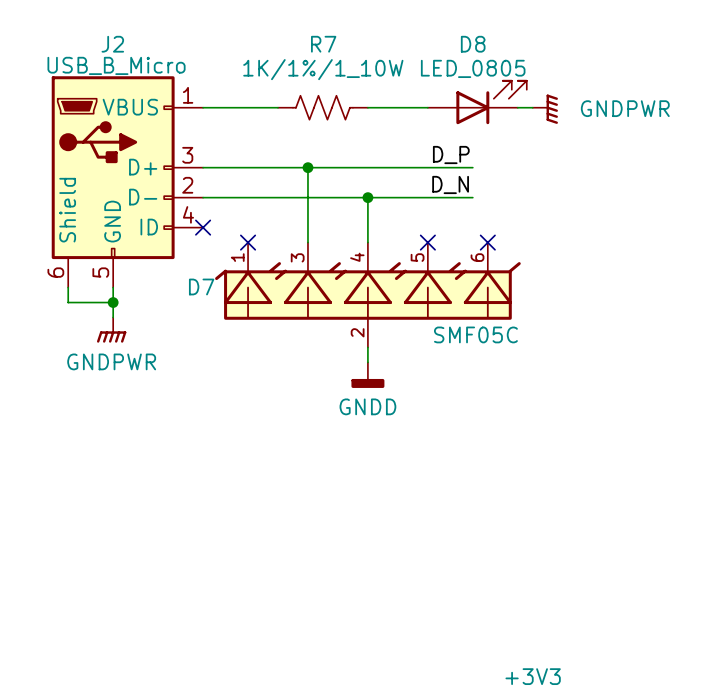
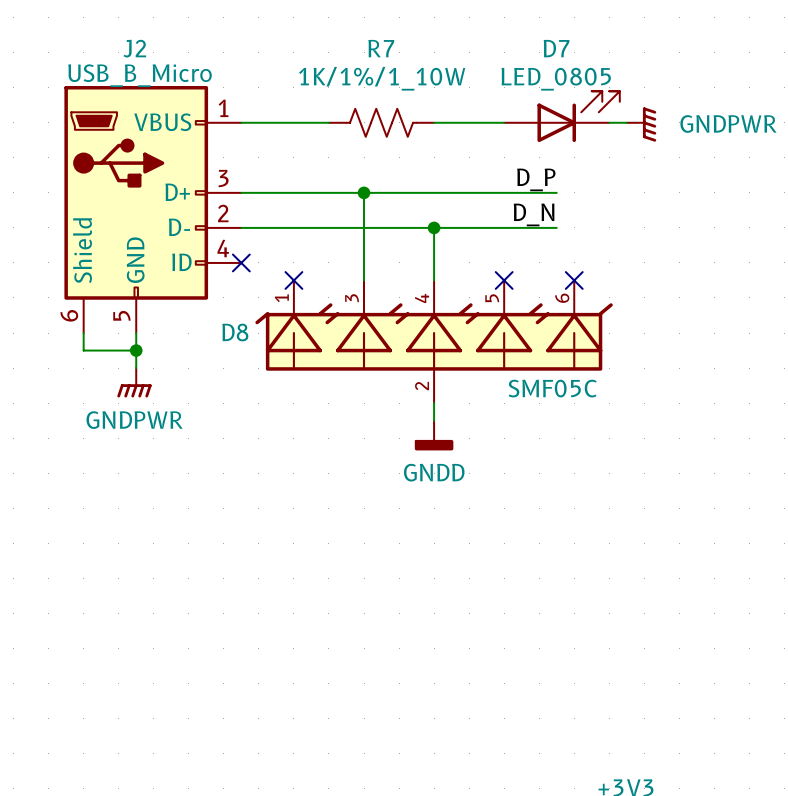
D8 name: D8 (473, 44) -> D7 (556, 48)
D7 name: D7 (201, 286) -> D8 (235, 332)

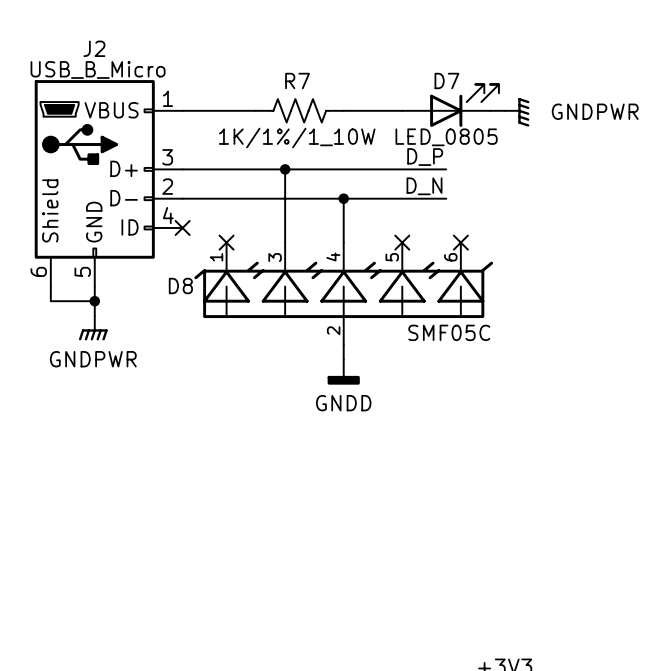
R7 name position: R7 (381, 48) -> R7 (297, 80)
D7 name position: D7 (556, 48) -> D7 (446, 80)
R7 value position: 1K/1%/1_10W (382, 78) -> 1K/1%/1_10W (297, 138)
D7 value position: LED_0805 (556, 79) -> LED_0805 (446, 137)

